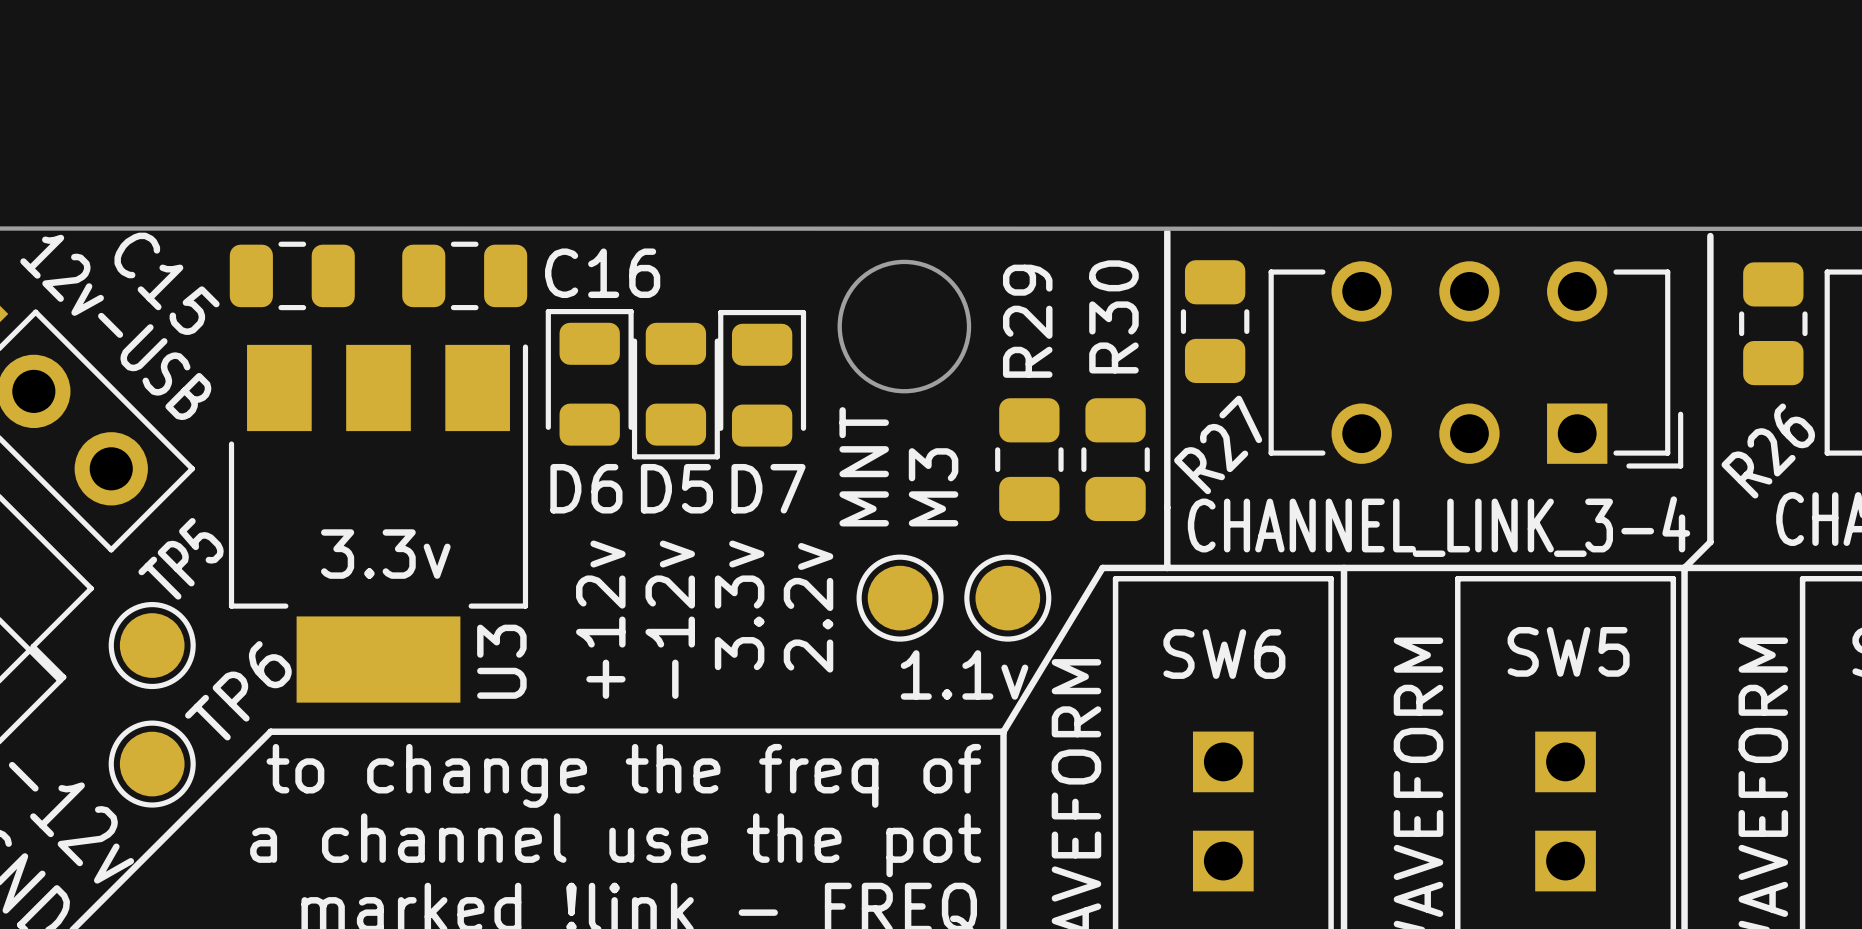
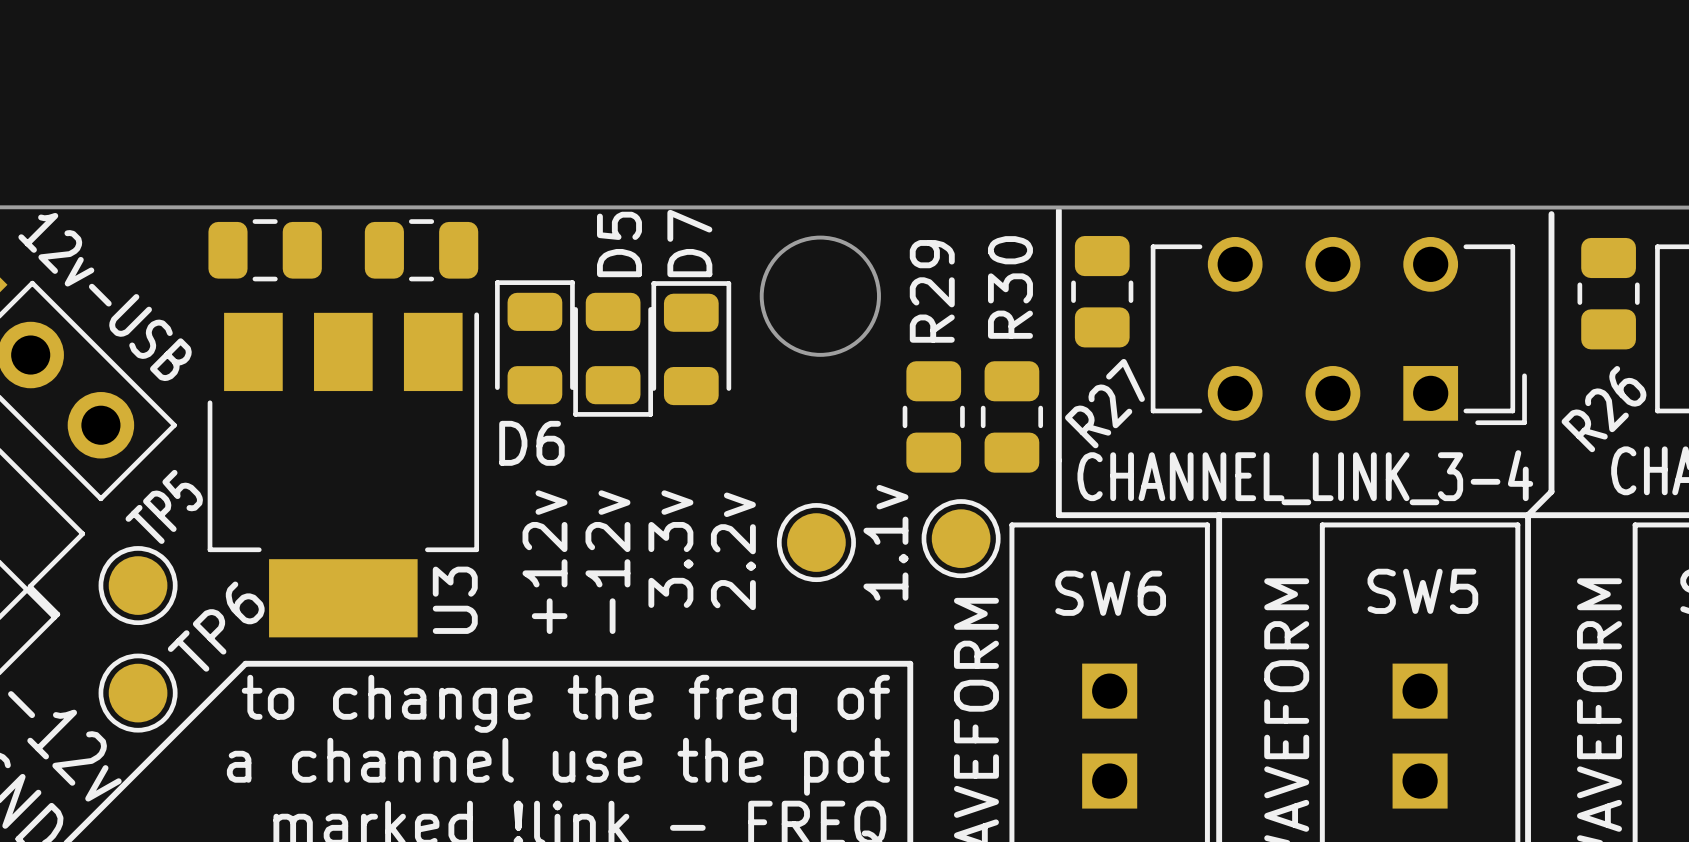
C16 name: C16 (602, 273) -> none
C15 name: C15 (167, 283) -> none
text: MNT (864, 466) -> none
text: M3 (933, 487) -> none
D5 name rotation: 0° (676, 488) -> 90° counterclockwise (619, 244)
D5 name position: D5 (676, 488) -> D5 (619, 244)
D7 name rotation: 0° (768, 488) -> 90° counterclockwise (689, 243)
D7 name position: D7 (768, 488) -> D7 (689, 243)
text: 3.3v (385, 554) -> none
line: (1167, 567) (1102, 567) (1003, 731) -> none
part position: (1007, 598) -> (961, 538)
text rotation: 0° (964, 674) -> 90° counterclockwise (885, 542)

